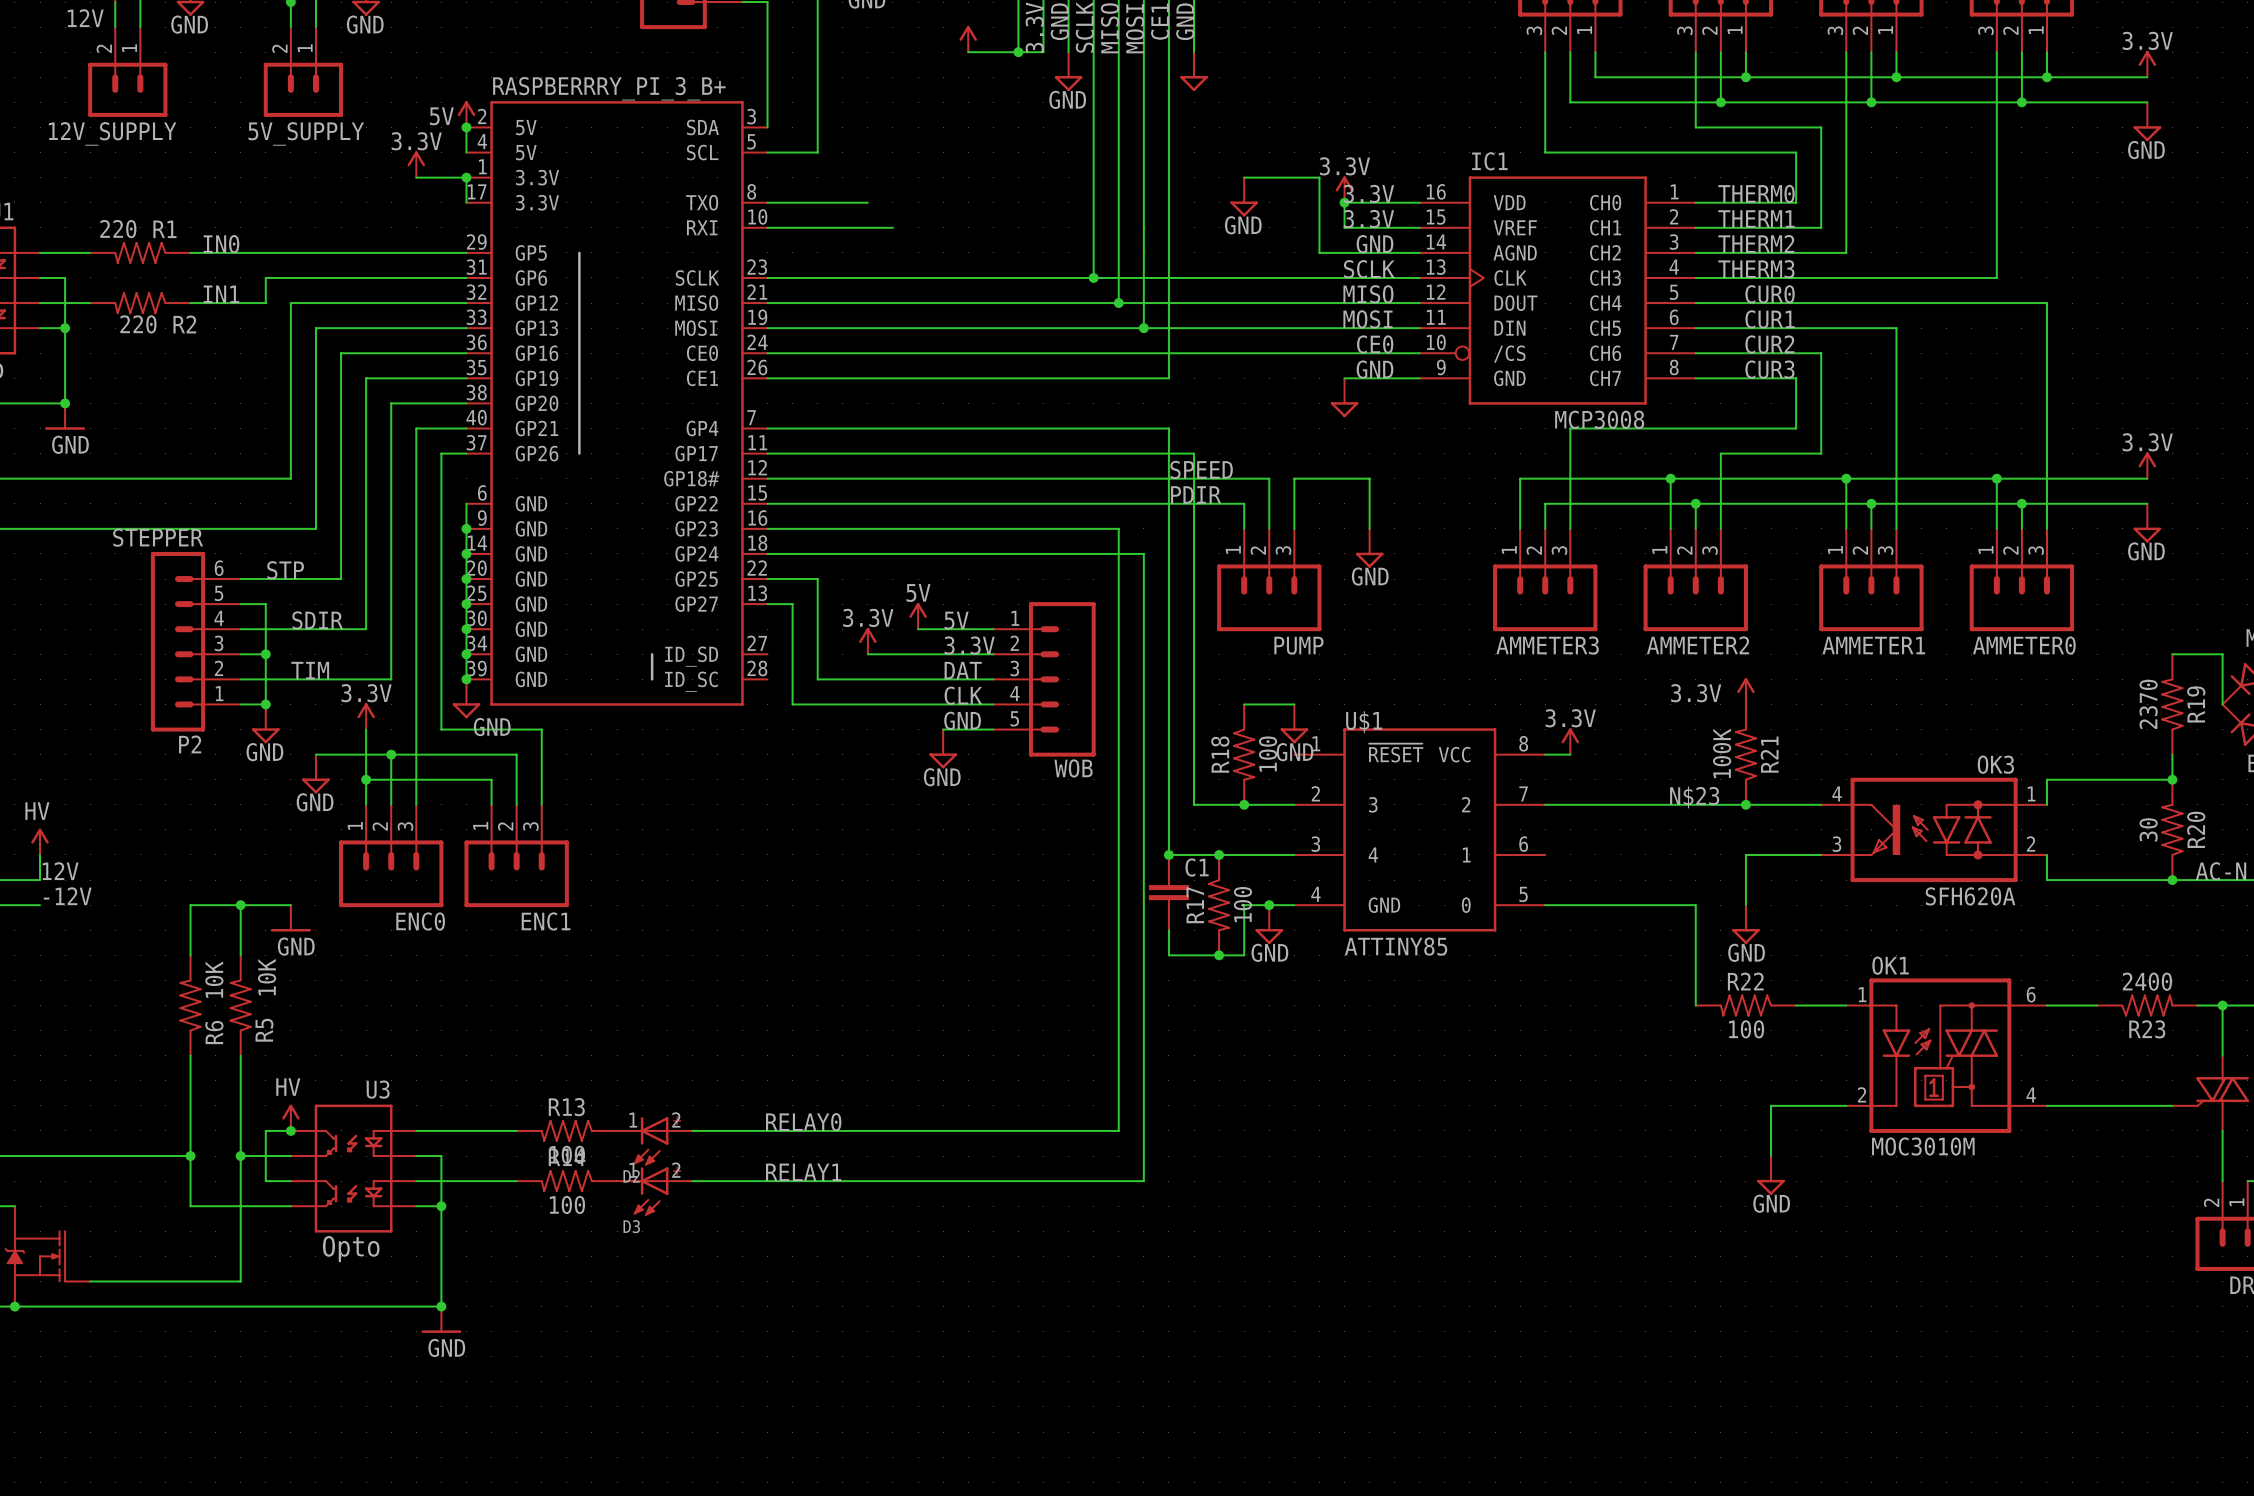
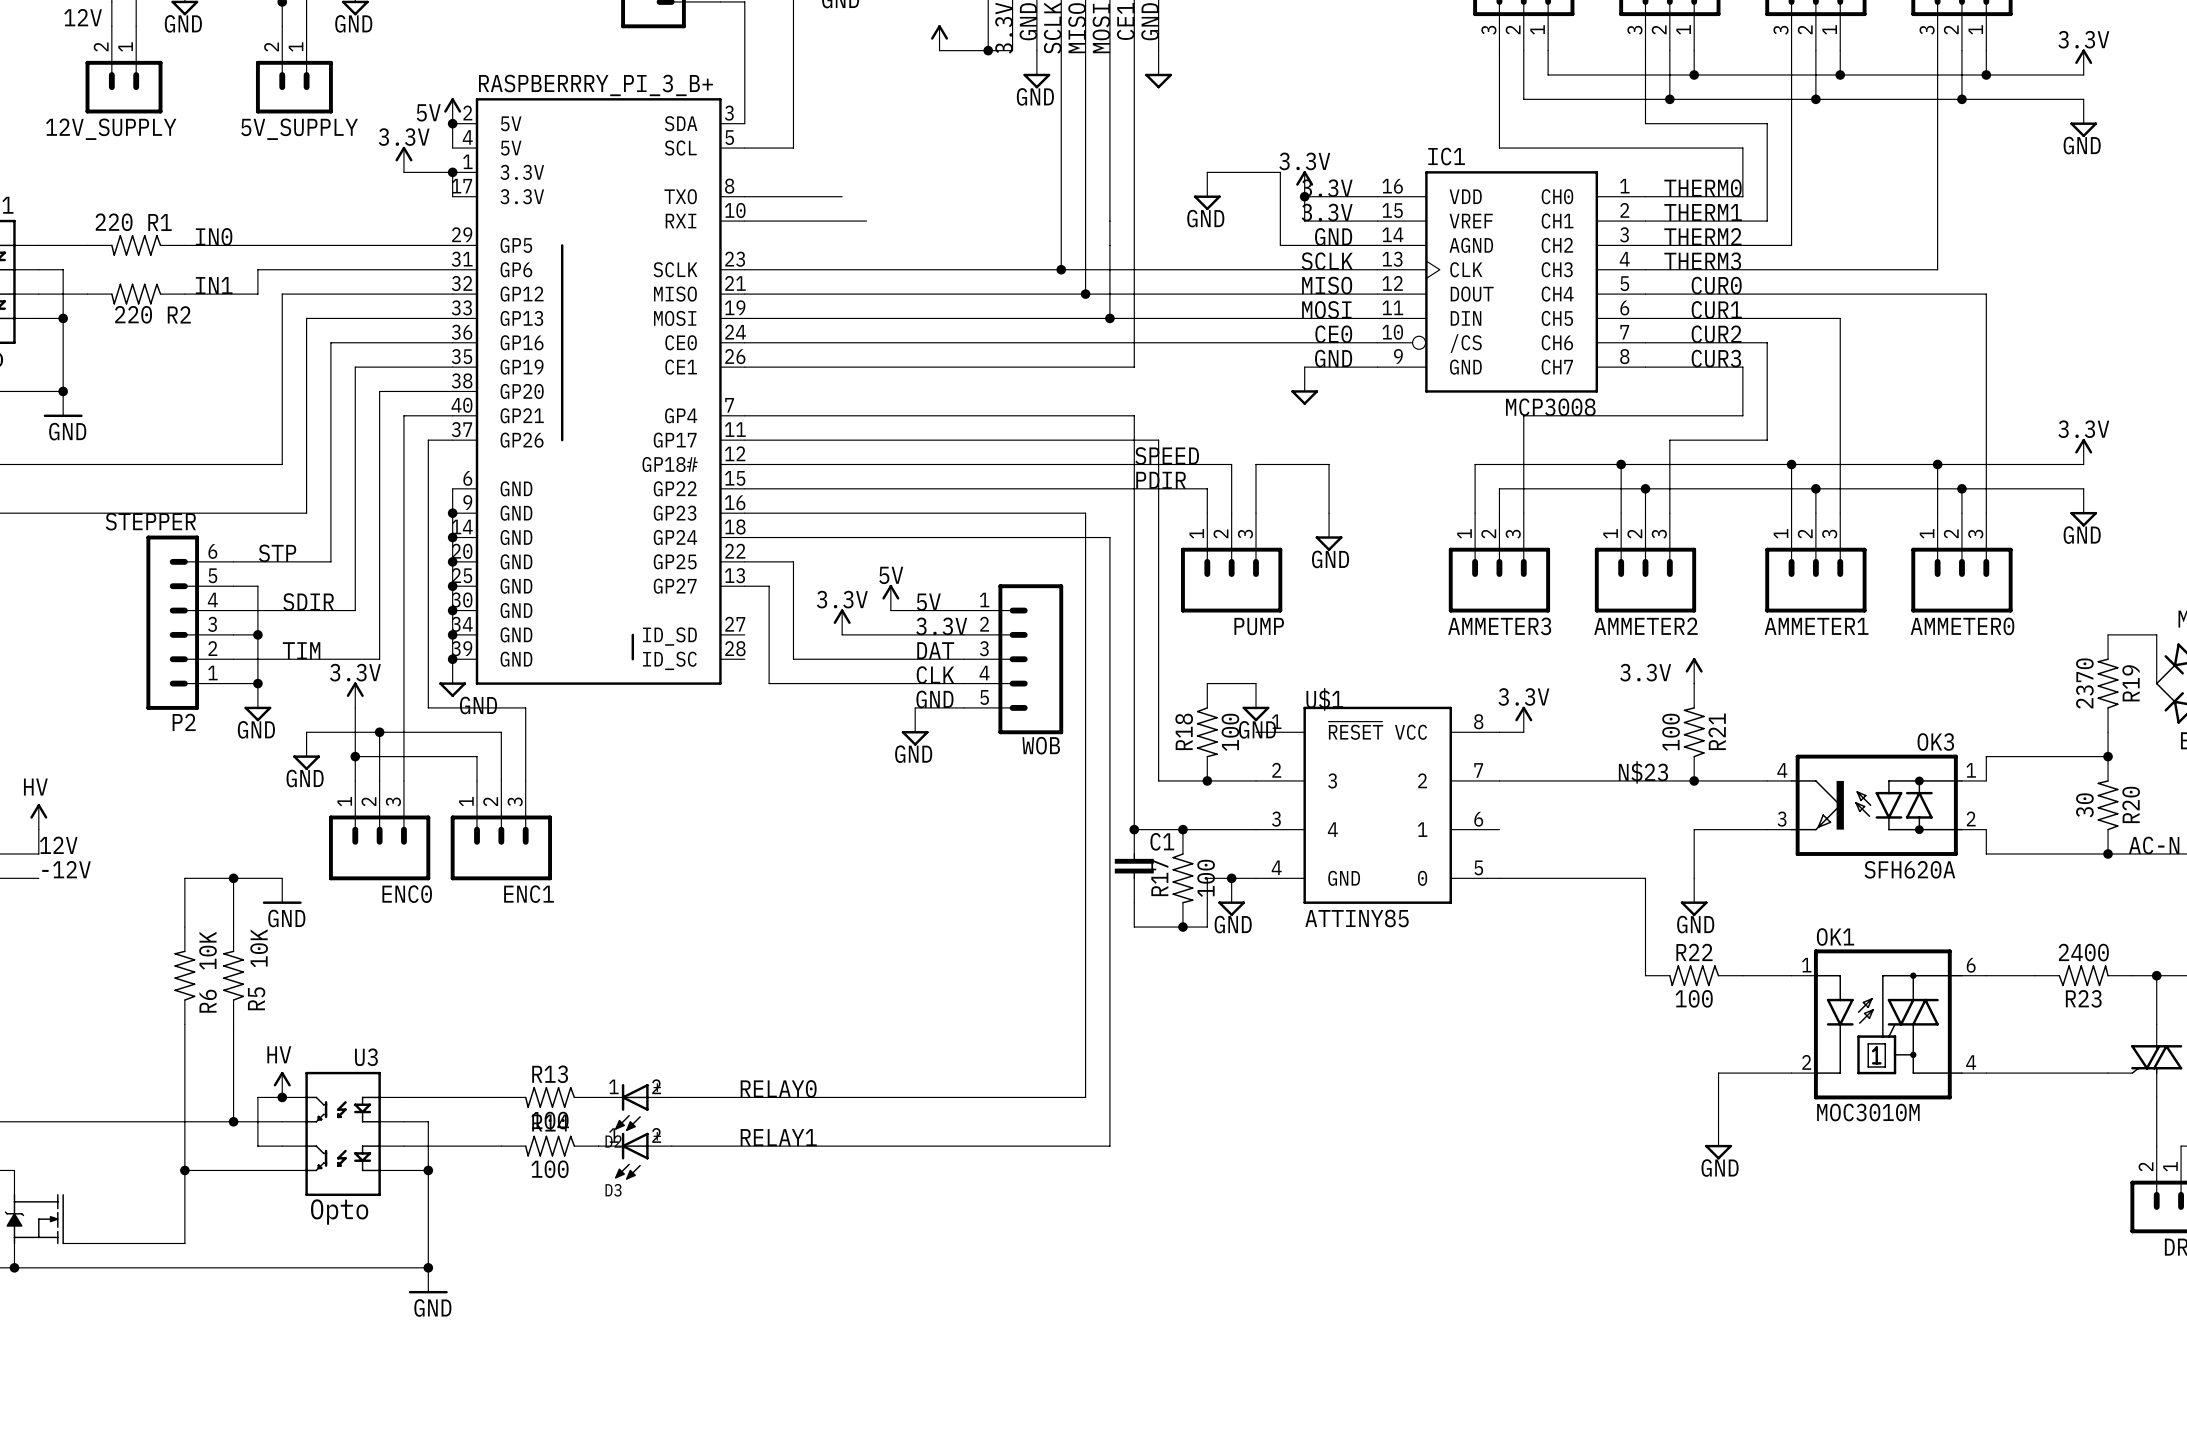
R21 value: 100K (1722, 753) -> 100 (1671, 732)
wire: none -> (184, 1121) (233, 1121)
junction position: (190, 1156) -> (184, 1170)
wire: (240, 1156) (240, 1281) (190, 1281) -> (184, 1170) (184, 1243)

